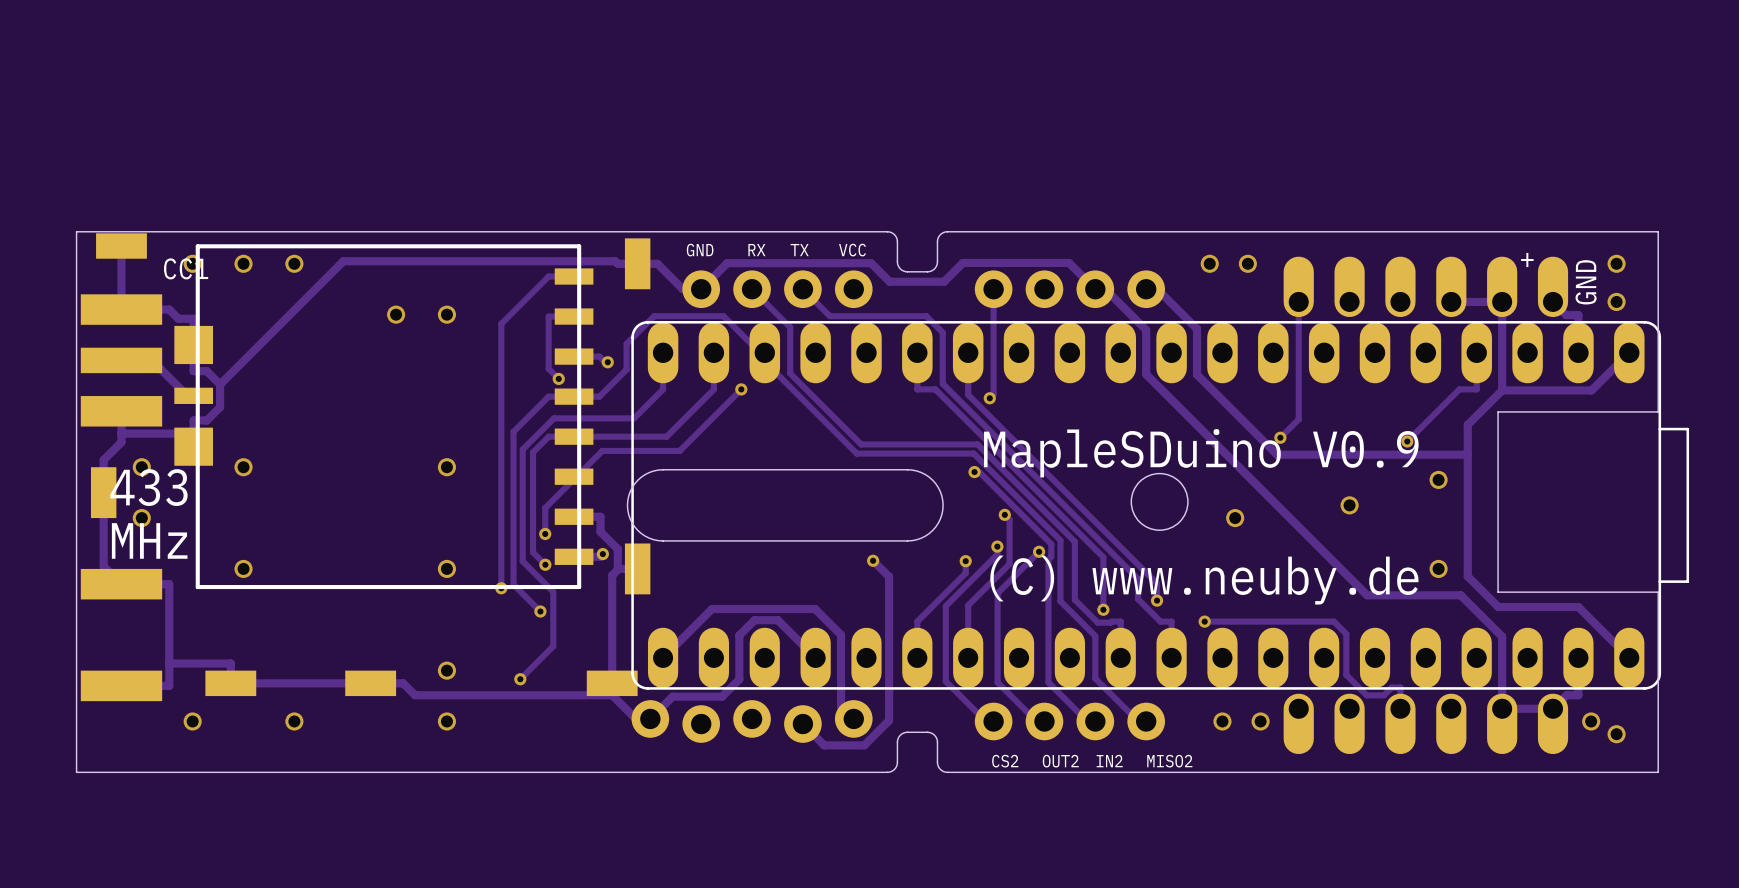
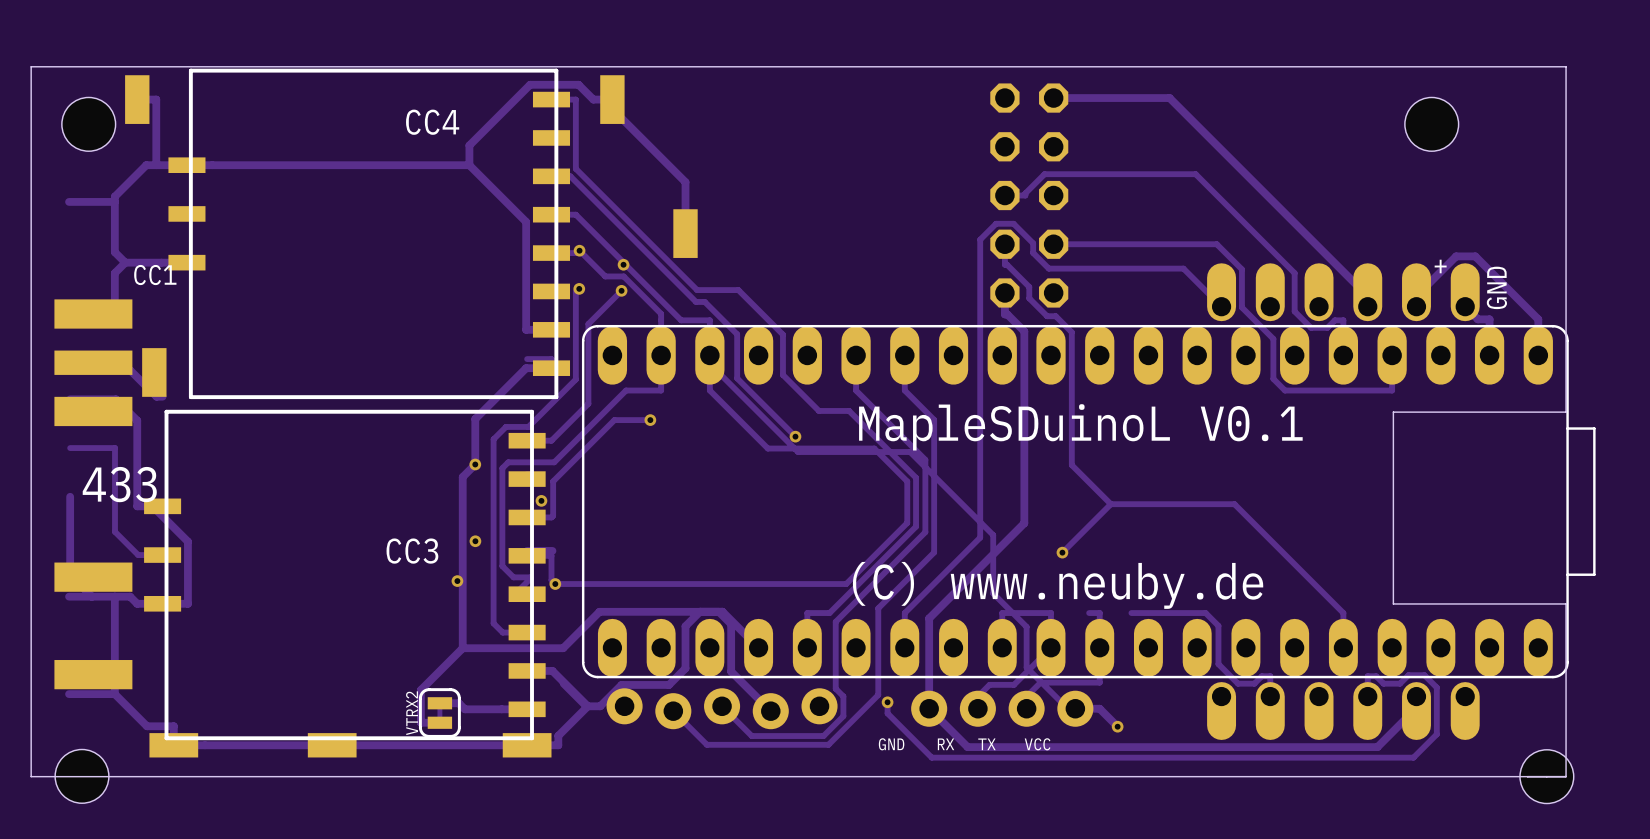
track: none -> (137, 99) (156, 99) (156, 165)
part: none -> (137, 99)
track: none -> (551, 99) (575, 99) (575, 168) (697, 290) (738, 290) (782, 334) (782, 374) (818, 410) (849, 410) (916, 477) (916, 526) (829, 613) (807, 613) (807, 647)
track: none -> (602, 99) (685, 182) (685, 233)
track: none -> (612, 99) (593, 99) (578, 84) (530, 84) (469, 145) (469, 165)
part: none -> (612, 99)
hole: none -> (88, 124)
hole: none -> (1431, 124)
track: none -> (469, 165) (526, 221) (526, 329) (551, 329)
track: none -> (469, 165) (146, 165) (114, 196) (114, 252) (125, 262)
track: none -> (551, 176) (570, 176) (696, 301) (704, 301) (737, 334) (737, 378) (795, 436)
track: none -> (1004, 195) (1025, 195) (1044, 174) (1195, 174) (1294, 273) (1294, 311) (1311, 327) (1327, 327) (1334, 320) (1343, 320) (1343, 355)
part: none -> (1029, 195)
track: none -> (114, 201) (69, 201)
track: none -> (551, 214) (575, 214) (623, 262) (623, 264) (681, 320) (709, 320) (709, 355)
CC4: none -> (369, 233)
part: none -> (685, 233)
board edge: (1658, 231) (947, 231) (938, 236) (937, 264) (933, 269) (927, 271) (906, 271) (900, 268) (897, 263) (896, 237) (893, 233) (887, 231) (76, 231) (76, 772) (887, 772) (896, 767) (897, 739) (901, 734) (907, 732) (928, 732) (934, 735) (937, 741) (938, 766) (941, 770) (947, 772) (1658, 772) -> (1566, 239) (1566, 66) (31, 66) (31, 776) (1566, 776) (1566, 757)
track: none -> (1004, 244) (1004, 264) (1029, 286) (1029, 298) (1047, 316) (1055, 316) (1071, 332) (1071, 465) (1110, 504)
via: none -> (579, 250)
track: none -> (551, 253) (577, 253) (579, 250) (605, 276) (623, 276) (661, 313) (661, 355)
track: (121, 246) (121, 309) (169, 309) (178, 318) (193, 318) (193, 371) (206, 371) (220, 384) -> none
part: (121, 246) -> none
text: GND (700, 250) -> none
text: RX (756, 250) -> none
text: TX (799, 250) -> none
text: VCC (852, 250) -> none
track: none -> (125, 262) (114, 273) (114, 299)
track: none -> (186, 262) (125, 262)
via: none -> (623, 264)
via: (192, 263) -> none
via: (243, 263) -> none
via: (294, 263) -> none
part: (637, 263) -> none
via: (1209, 263) -> none
via: (1247, 263) -> none
via: (1616, 263) -> none
track: (574, 276) (548, 276) (501, 323) (501, 588) -> none
via: none -> (579, 288)
track: none -> (621, 290) (588, 323) (588, 403) (551, 440) (527, 440)
via: none -> (621, 290)
track: none -> (575, 291) (575, 379) (528, 426) (505, 426) (493, 439) (493, 623) (502, 632) (527, 632)
track: none -> (1004, 292) (1004, 314) (1007, 314) (1024, 331) (1024, 523) (929, 618) (929, 696) (916, 708)
track: (752, 289) (790, 327) (790, 373) (861, 444) (977, 444) (1074, 541) (1074, 599) (1097, 622) (1111, 621) -> (1002, 647) (1002, 613) (1042, 613)
part: (777, 289) -> none
track: (802, 289) (829, 316) (926, 316) (942, 332) (942, 383) (1137, 578) (1137, 599) (1160, 621) -> none
track: (993, 289) (993, 394) (989, 398) -> none
part: (1069, 289) -> none
track: (1146, 289) (1157, 289) (1197, 328) (1197, 374) (1277, 454) (1467, 454) -> none
track: (1298, 301) (1298, 419) (1280, 437) -> (1221, 306) (1183, 268) (1048, 268) (1033, 252) (1033, 243) (1013, 223) (996, 223) (980, 239) (980, 537) (904, 613)
track: (1451, 301) (1502, 301) (1502, 390) -> (1367, 306) (1367, 296) (1169, 98) (1053, 98)
via: (1616, 301) -> none
via: (396, 314) -> none
via: (446, 314) -> none
track: (574, 316) (548, 316) (548, 368) (558, 378) -> none
track: (663, 352) (663, 389) (634, 418) (553, 418) (522, 449) (522, 561) (553, 591) (553, 646) (520, 679) -> none
track: (1629, 352) (1591, 390) (1502, 390) -> (1538, 355) (1538, 319) (1475, 256) (1456, 256) (1416, 296) (1416, 306)
track: (764, 357) (723, 316) (654, 316) (626, 343) (626, 369) (599, 396) (548, 396) (513, 431) (513, 584) (540, 611) -> none
track: none -> (709, 363) (709, 390) (767, 448) (874, 448) (907, 481) (907, 522) (846, 584) (555, 584) (551, 580) (551, 555) (527, 555)
via: (607, 362) -> none
track: none -> (551, 368) (526, 368) (475, 419) (475, 464) (462, 477) (462, 648)
part: none -> (154, 372)
via: (558, 378) -> none
track: (220, 384) (220, 407) (206, 420) (193, 420) (193, 446) -> none
track: (220, 384) (343, 261) (615, 261) (617, 263) (657, 263) (682, 289) (701, 289) (727, 263) (871, 263) (889, 281) (944, 281) (962, 262) (1069, 262) (1095, 289) (1105, 289) (1146, 330) (1146, 374) (1367, 595) (1460, 595) (1502, 636) (1502, 708) (1553, 708) (1566, 695) (1578, 695) (1578, 657) -> none
track: (713, 389) (666, 436) (548, 436) (533, 452) (533, 552) (545, 564) -> (661, 390) (626, 390) (554, 462) (508, 462) (502, 468) (502, 566) (513, 577) (530, 577) (514, 594) (527, 594)
track: (741, 389) (679, 450) (602, 450) (545, 508) (545, 533) -> none
via position: (741, 389) -> (650, 420)
track: (917, 389) (935, 389) (1103, 557) (1103, 609) -> (856, 390) (925, 459) (925, 532) (835, 621) (835, 688) (843, 696) (843, 716) (823, 736) (751, 736) (722, 706)
track: (968, 389) (968, 394) (1157, 583) (1157, 600) -> (904, 390) (934, 419) (934, 552) (878, 608) (878, 695) (828, 744) (706, 744) (673, 711)
track: (1459, 389) (1407, 441) -> (1375, 390) (1284, 390) (1273, 378) (1273, 338) (1241, 307) (1241, 269) (1216, 244) (1053, 244)
track: (1502, 390) (1467, 424) (1467, 576) (1498, 607) (1578, 607) (1629, 657) -> none
track: none -> (70, 399) (115, 399) (137, 420) (137, 506) (162, 506)
via: (989, 398) -> none
track: (121, 411) (121, 442) (103, 460) (103, 566) (121, 584) (169, 584) (169, 685) (121, 685) -> none
board edge: (1498, 411) (1498, 592) (1658, 592) (1658, 612) -> (1412, 412) (1393, 412) (1393, 603) (1566, 603)
part: (383, 416) -> none
track: none -> (650, 420) (614, 420) (553, 481) (553, 515) (551, 517) (527, 517)
track: (193, 433) (121, 433) -> none
via: none -> (795, 436)
via: (1280, 437) -> none
via: (1407, 441) -> none
track: none -> (70, 448) (114, 448) (114, 531) (138, 555) (162, 555)
text: MapleSDuino V0.9 (1201, 453) -> MapleSDuinoL V0.1 (1080, 427)
via: none -> (475, 464)
via: (141, 467) -> none
via: (243, 467) -> none
via: (446, 467) -> none
board edge: (907, 469) (658, 470) (645, 474) (634, 483) (628, 496) (627, 510) (630, 518) (637, 530) (649, 538) (658, 540) (912, 540) (925, 536) (935, 527) (941, 514) (942, 500) (938, 487) (929, 477) (921, 472) (907, 469) -> none
track: (974, 472) (979, 472) (1051, 544) (1051, 556) (1048, 559) (1048, 682) (1087, 721) (1095, 721) -> none
via: (974, 472) -> none
round board edge: [1131, 473, 1188, 531] -> none
via: (1438, 479) -> none
part: (103, 492) -> none
track: none -> (70, 496) (70, 574) (91, 596)
via: none -> (541, 500)
via: (1349, 505) -> none
track: none -> (1110, 504) (1234, 504) (1343, 613) (1343, 647)
track: none -> (1110, 504) (1062, 552)
track: none -> (152, 506) (187, 541) (187, 603) (137, 603) (130, 596) (69, 596)
track: (1004, 514) (1009, 519) (1009, 564) (968, 605) (968, 621) -> none
via: (1004, 514) -> none
track: (574, 516) (600, 516) (600, 531) (617, 549) (617, 568) (637, 568) -> none
via: (141, 518) -> none
via: (1235, 518) -> none
via: (545, 533) -> none
text: MHz (149, 540) -> none
via: none -> (475, 541)
track: (997, 546) (997, 554) (945, 606) (945, 681) (985, 721) (993, 721) -> none
via: (997, 546) -> none
track: (1039, 551) (997, 593) (997, 682) (1036, 721) (1044, 721) -> none
via: (1039, 551) -> none
via: (602, 554) -> none
via: none -> (1062, 552)
track: (873, 560) (889, 576) (889, 720) (864, 745) (824, 745) (802, 724) -> none
via: (873, 560) -> none
track: (965, 561) (965, 573) (917, 621) (917, 657) -> none
via: (965, 561) -> none
via: (545, 564) -> none
via: (243, 568) -> none
via: (446, 568) -> none
track: (618, 568) (612, 575) (612, 695) (415, 695) (403, 683) (230, 683) (230, 663) (169, 663) -> none
part: (637, 568) -> none
via: (1438, 568) -> none
text position: (C) www.neuby.de (1204, 580) -> (C) www.neuby.de (1058, 585)
CC3: none -> (344, 575)
via: none -> (555, 584)
via: (1157, 600) -> none
track: none -> (114, 596) (114, 694)
via: (1103, 609) -> none
via: (540, 611) -> none
via: (1204, 621) -> none
track: (1282, 621) (1333, 621) (1346, 634) (1346, 674) (1366, 695) (1383, 695) (1391, 687) (1400, 687) (1400, 708) -> (1205, 613) (1218, 625) (1218, 664) (1238, 683) (1254, 683) (1261, 676) (1270, 676) (1270, 696)
track: (663, 657) (711, 609) (815, 609) (841, 634) (841, 706) (853, 718) -> none
track: none -> (1051, 647) (1013, 684) (989, 684) (965, 708)
track: none -> (1099, 647) (1099, 682) (1040, 682) (1014, 708)
track: none -> (462, 648) (563, 648) (599, 611) (718, 611) (731, 624) (731, 671) (770, 711)
track: none -> (462, 648) (420, 690) (420, 722) (439, 722)
via: (446, 670) -> none
via: (520, 679) -> none
track: none -> (527, 670) (552, 670) (587, 706) (558, 735) (558, 745) (173, 745) (173, 726) (147, 726) (114, 694)
part: (230, 683) -> none
part position: (370, 683) -> (332, 745)
part position: (612, 683) -> (527, 745)
track: none -> (114, 694) (69, 694)
track: none -> (1367, 696) (1367, 676) (1376, 676) (1383, 683) (1400, 683) (1408, 675) (1424, 675) (1436, 687) (1436, 734) (1413, 757) (931, 757) (887, 713) (887, 702)
track: none -> (1416, 696) (1416, 708) (1377, 747) (967, 747) (923, 702)
via: none -> (887, 702)
track: none -> (439, 703) (458, 703) (464, 709) (527, 709)
via: (192, 721) -> none
via: (294, 721) -> none
via: (446, 721) -> none
part position: (752, 721) -> (722, 708)
track: none -> (1075, 708) (1099, 708) (1117, 726)
via: (1222, 721) -> none
via: (1260, 721) -> none
via: (1591, 721) -> none
VTRX2: none -> (439, 713)
via: (1616, 734) -> none
via: none -> (1117, 726)
text: none -> GND (891, 744)
part: none -> (173, 745)
text: CS2 (1005, 761) -> RX (946, 744)
text: OUT2 (1060, 761) -> TX (986, 744)
text: IN2 (1109, 761) -> VCC (1037, 744)
text: MISO2 (1169, 761) -> none
hole: none -> (82, 776)
hole: none -> (1546, 776)

